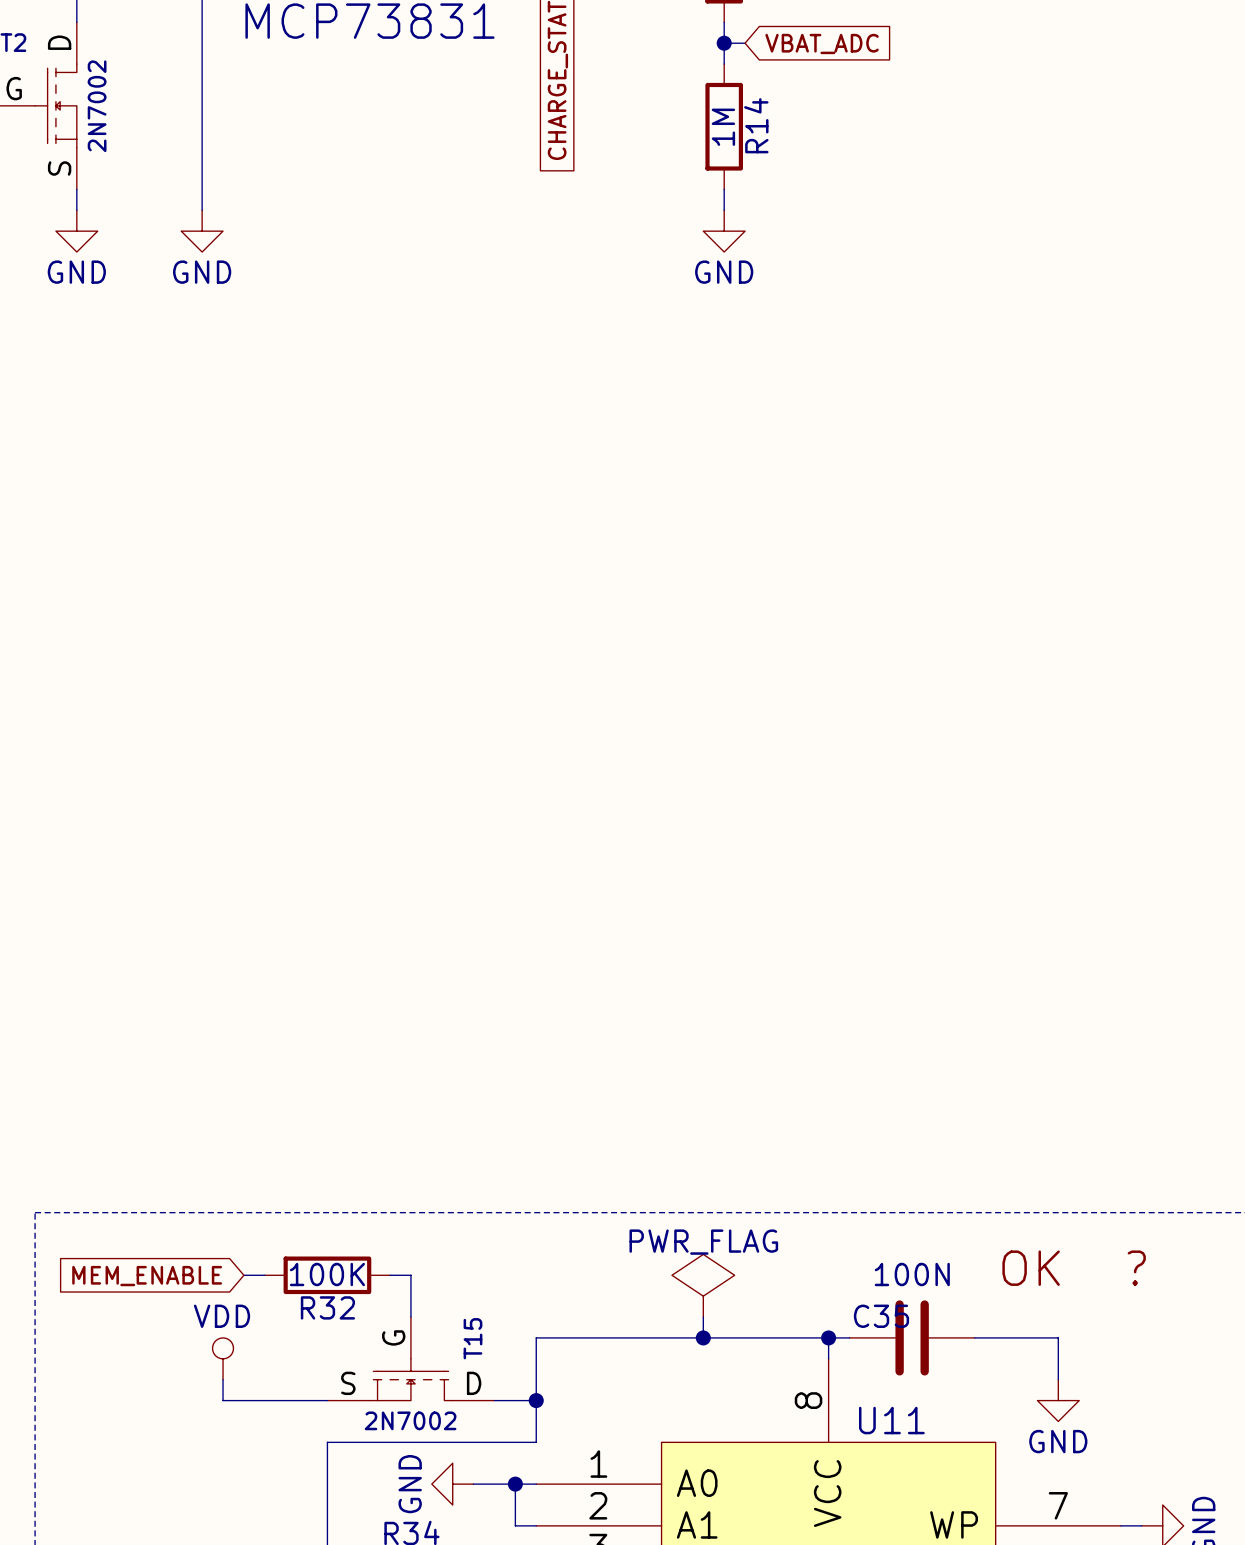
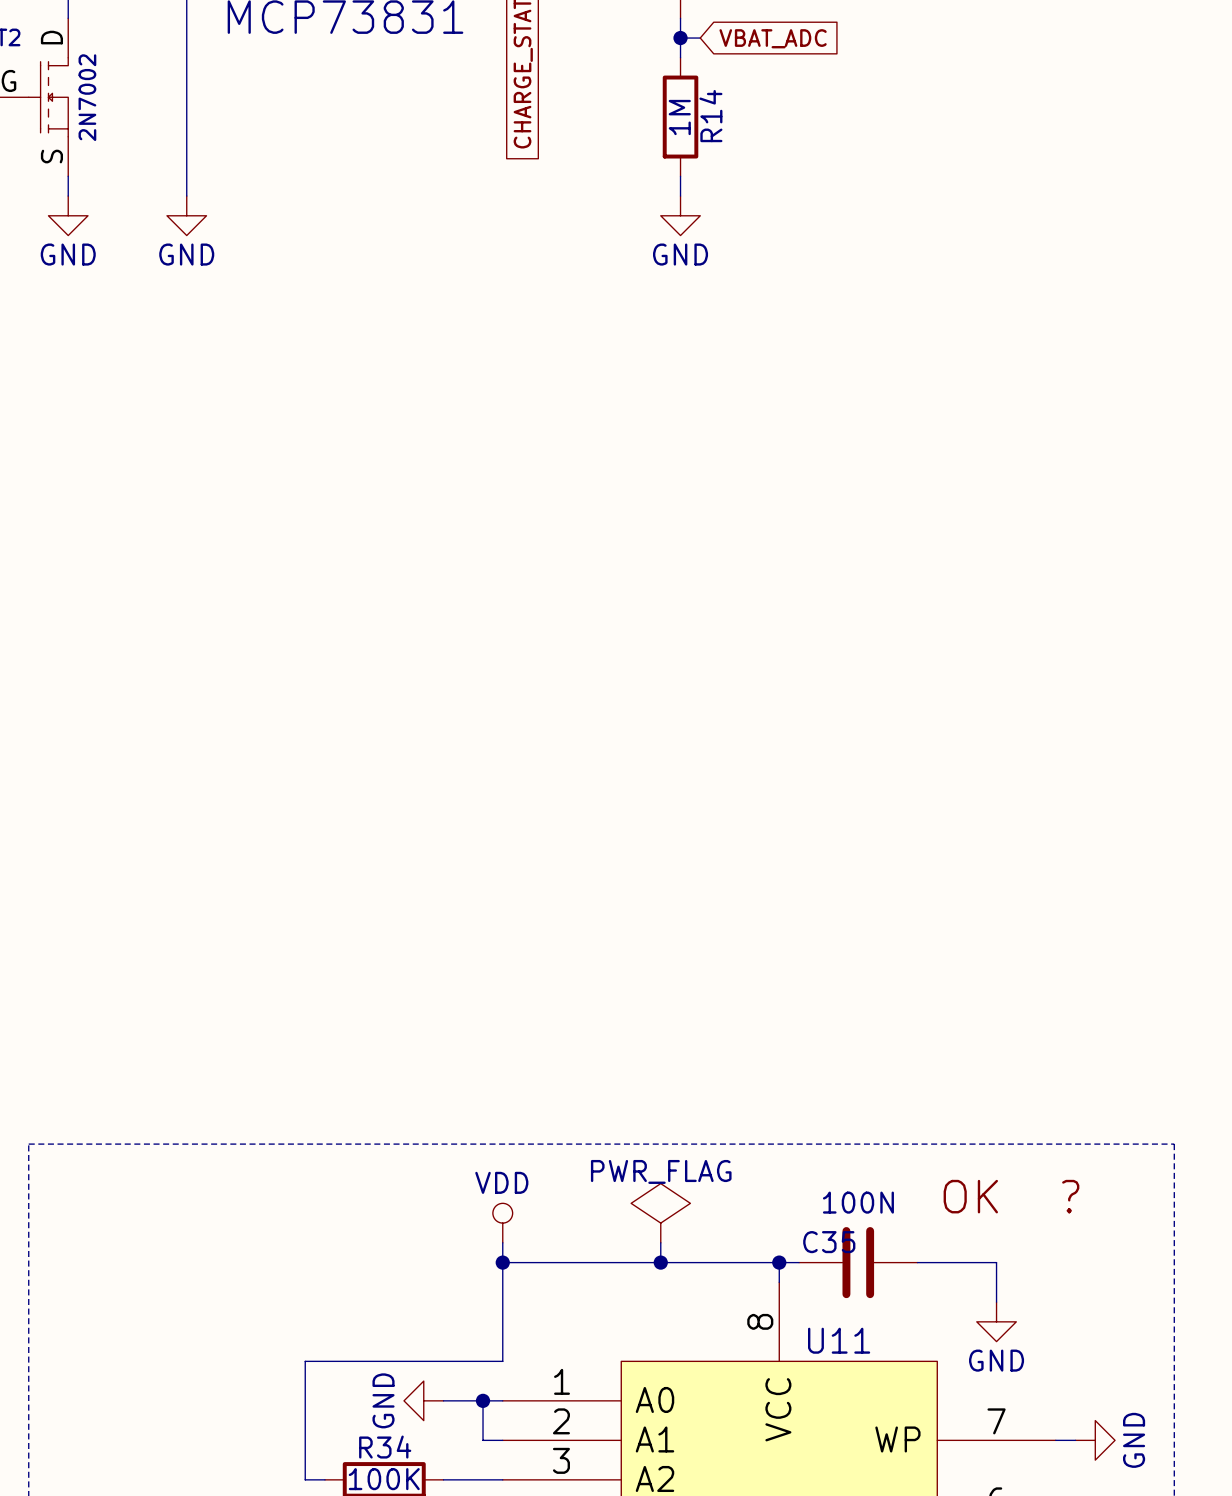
wire: (243, 1275) (264, 1275) -> none
R32: 100K (327, 1275) -> none
wire: (390, 1275) (410, 1275) (410, 1317) -> none
global label: MEM_ENABLE (147, 1276) -> none
wire: none -> (502, 1242) (502, 1262)
power symbol position: VDD (223, 1358) -> VDD (502, 1223)
T15: 2N7002 (410, 1358) -> none
wire: (223, 1379) (223, 1400) (327, 1400) -> none
wire: (494, 1400) (536, 1400) -> none
junction position: (536, 1400) -> (502, 1262)

